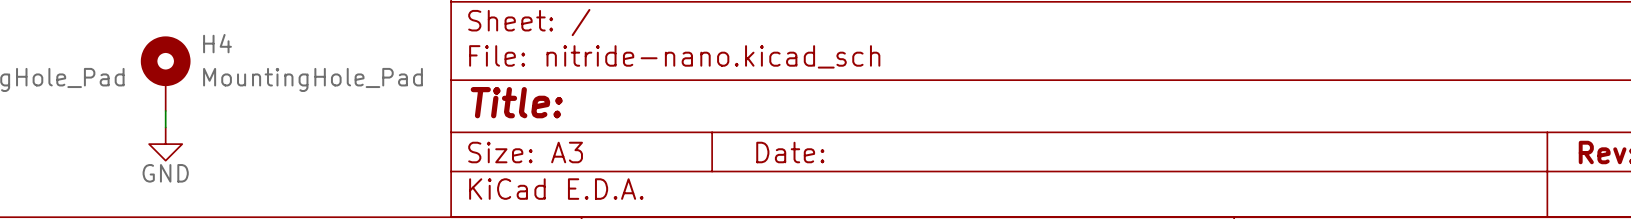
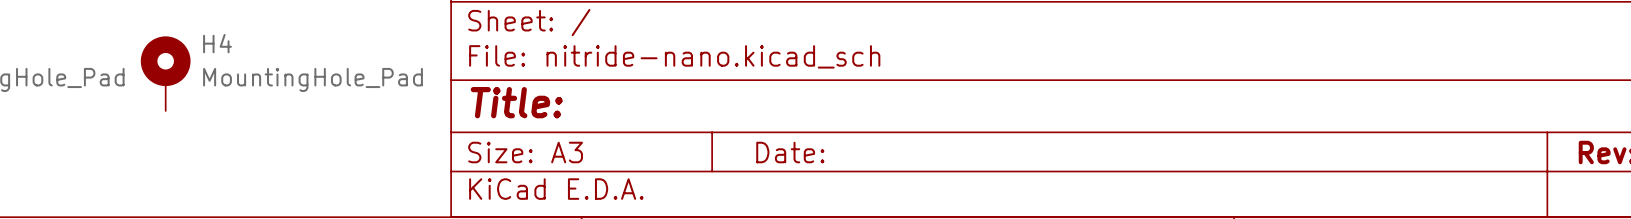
wire: (165, 110) (165, 127) -> none
power symbol: GND (165, 144) -> none

